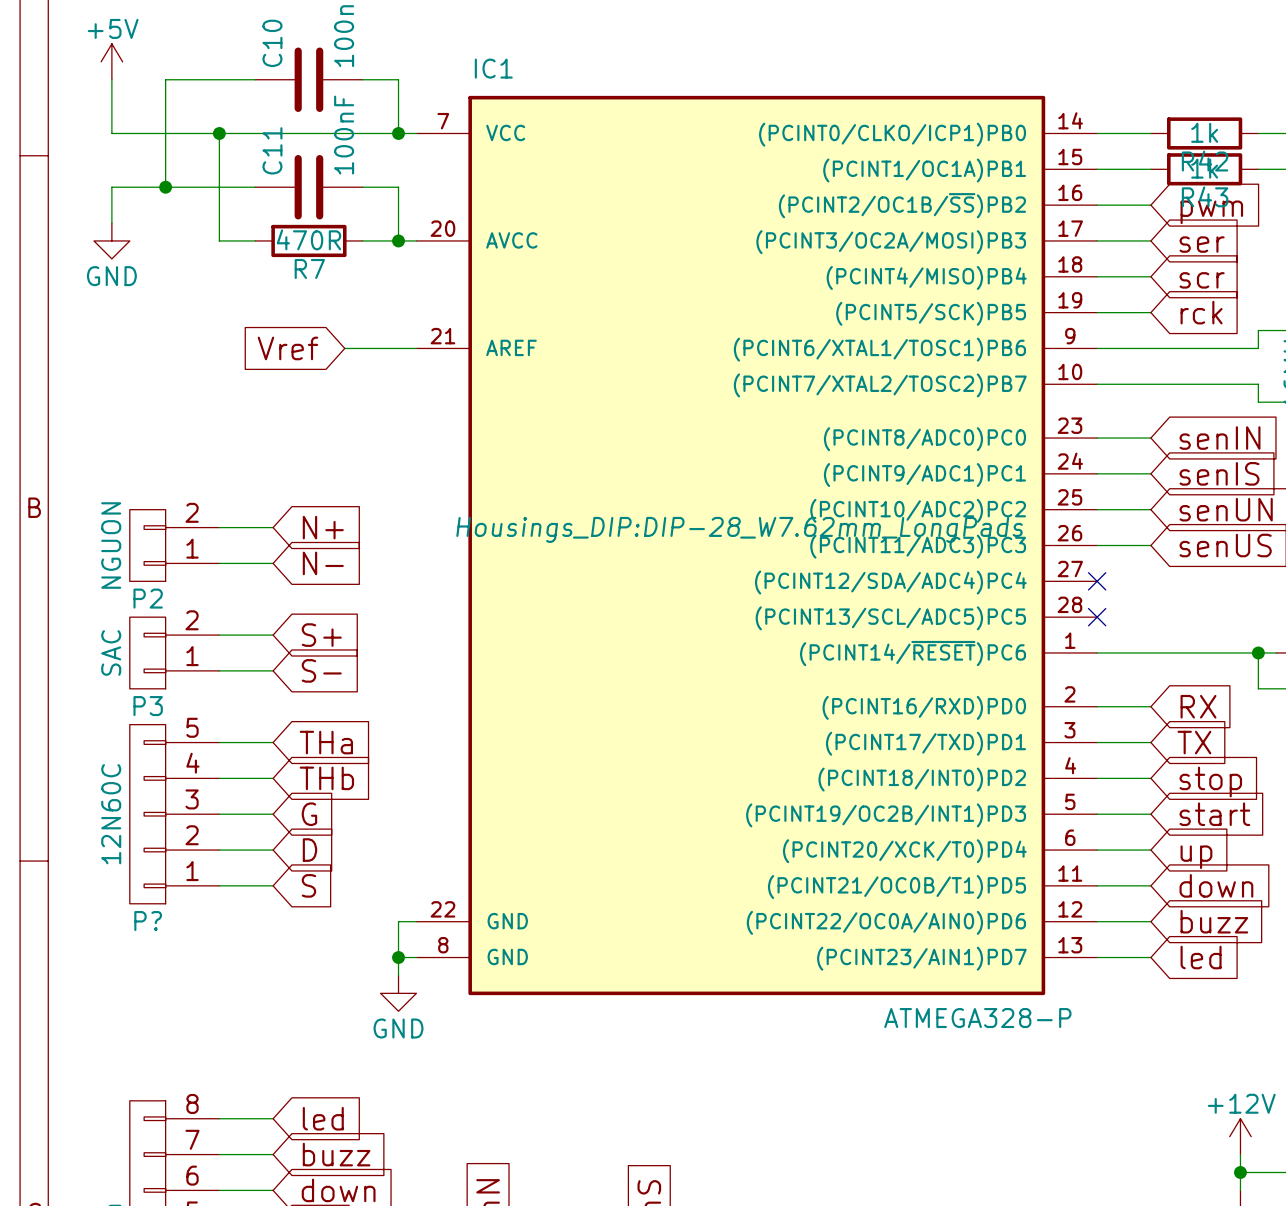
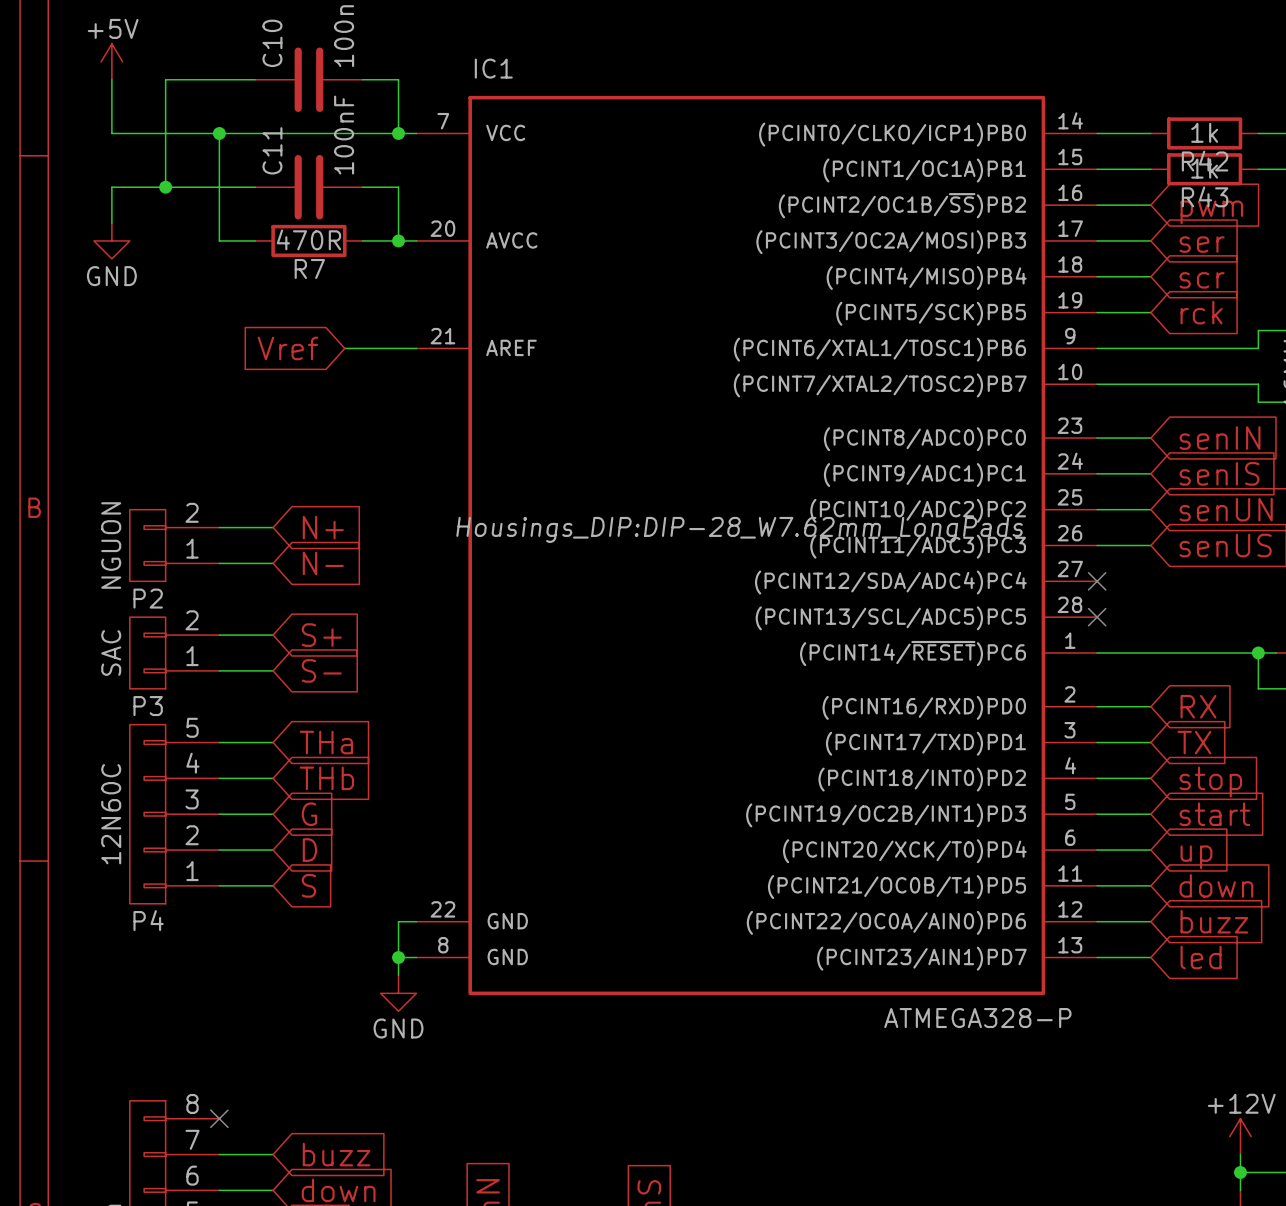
P? name: P? (148, 921) -> P4 (148, 920)
wire: (219, 1118) (273, 1118) -> none
no-connect mark: none -> (219, 1118)
global label: led (323, 1118) -> none

